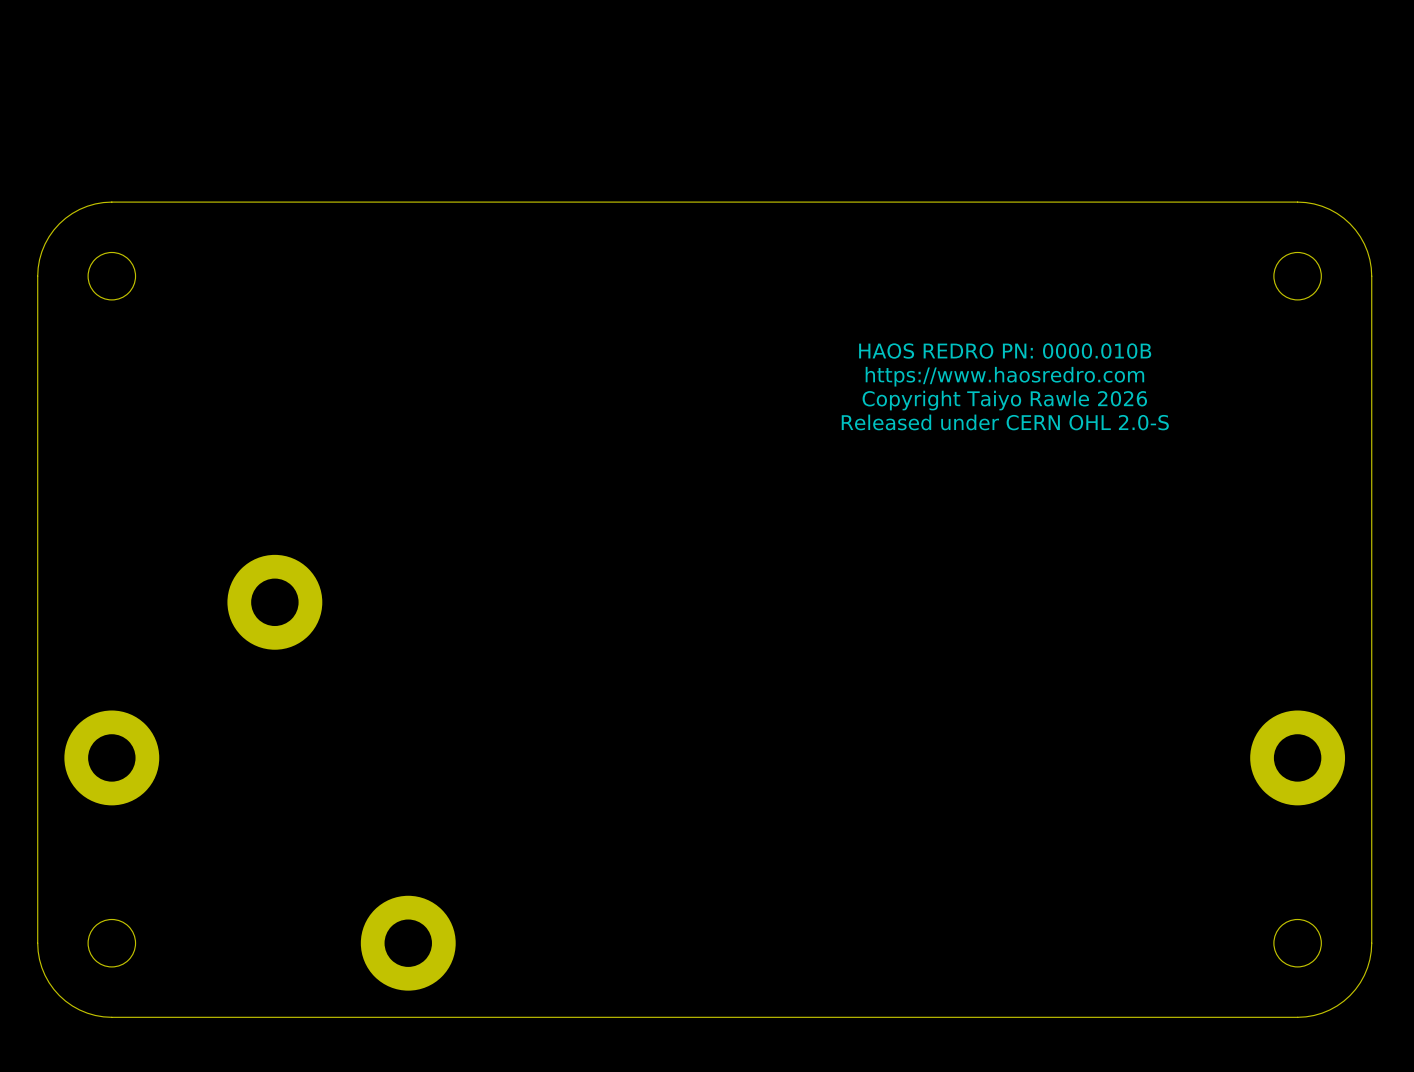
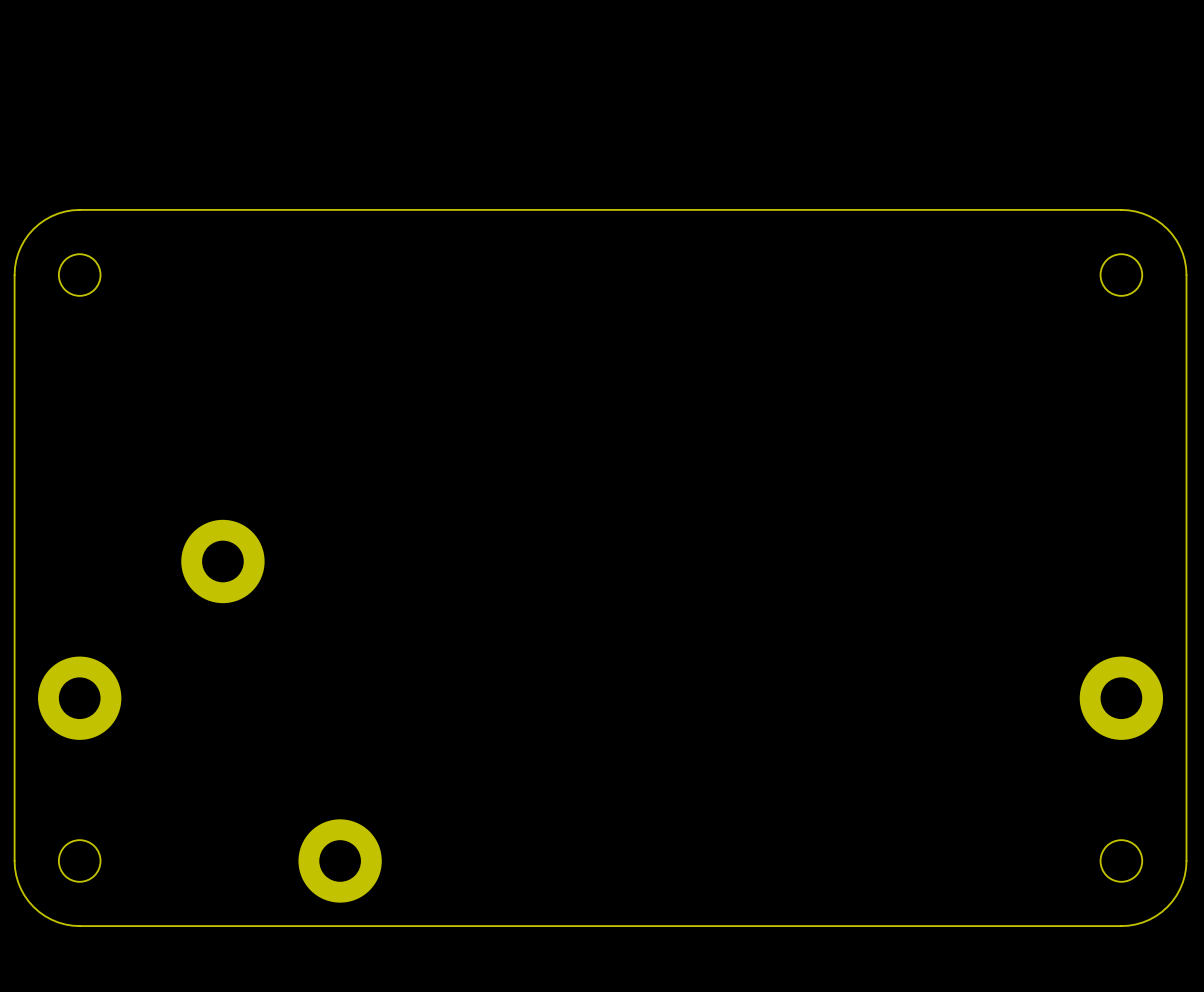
text: HAOS REDRO PN: 0000.010B (1005, 351) -> none
text: https://www.haosredro.com (1004, 376) -> none
text: Copyright Taiyo Rawle 2026 (1004, 400) -> none
text: Released under CERN OHL 2.0-S (1005, 422) -> none

